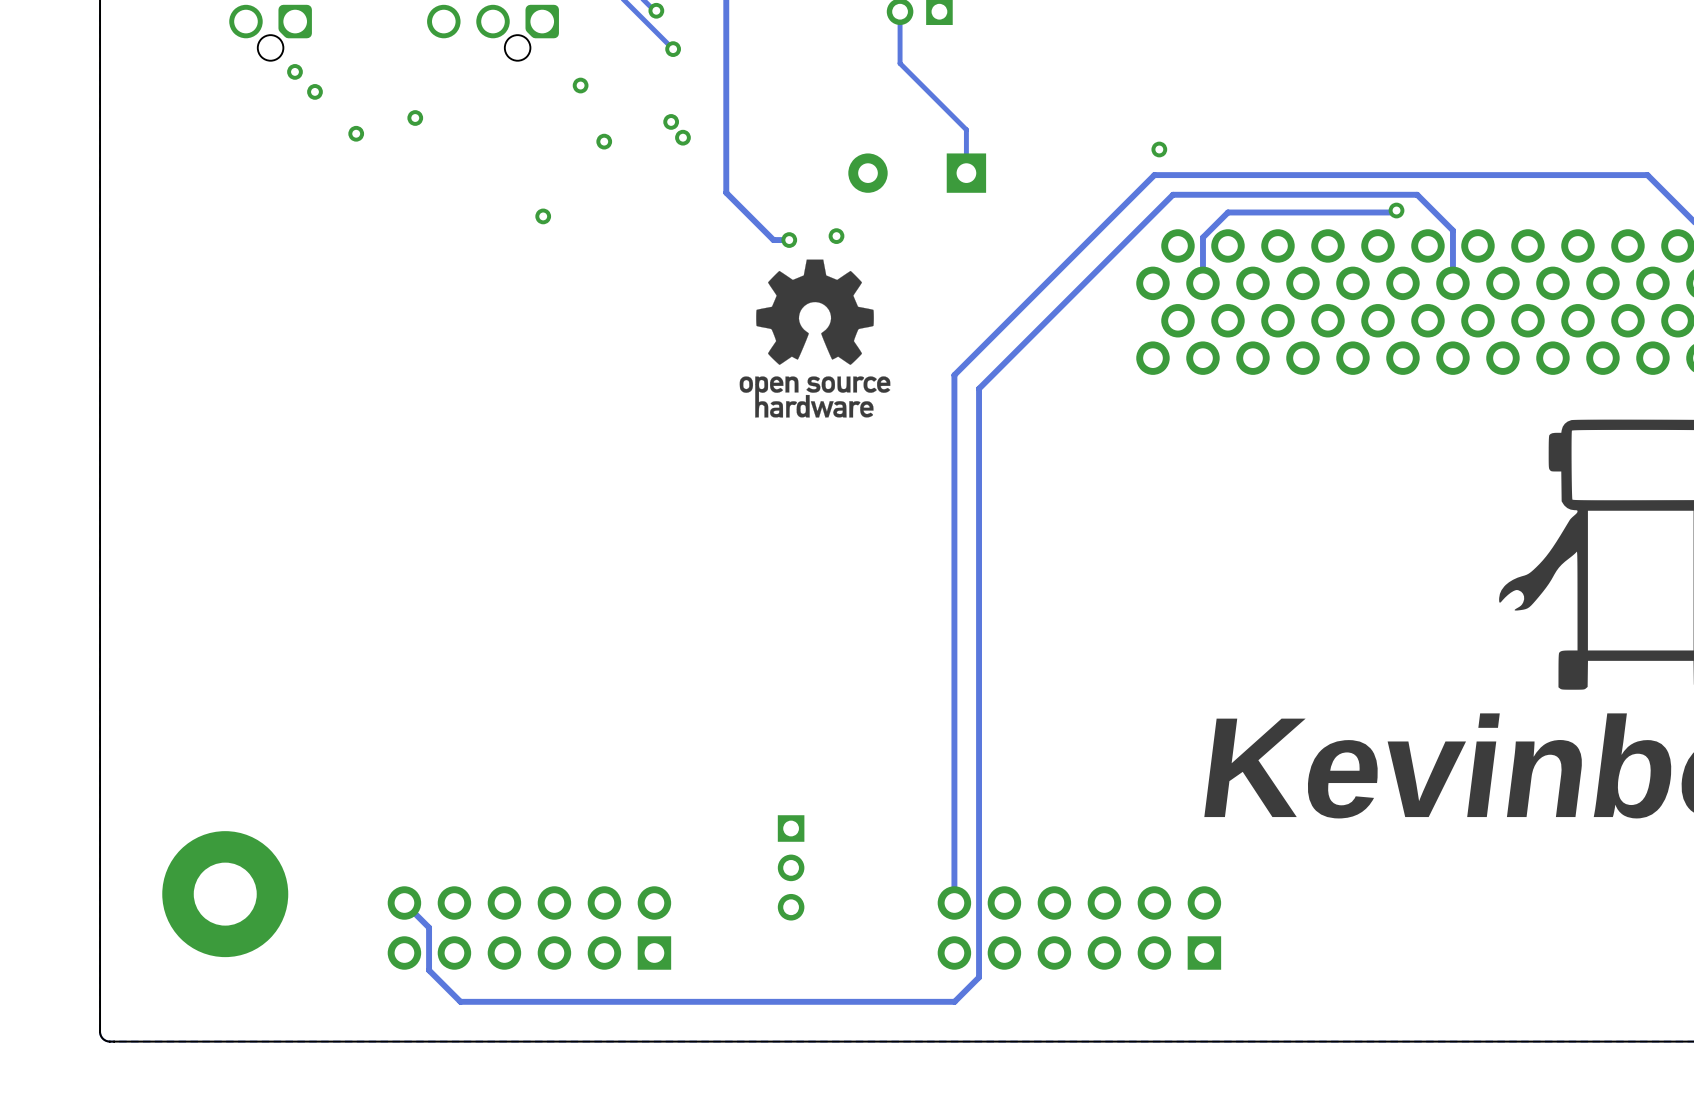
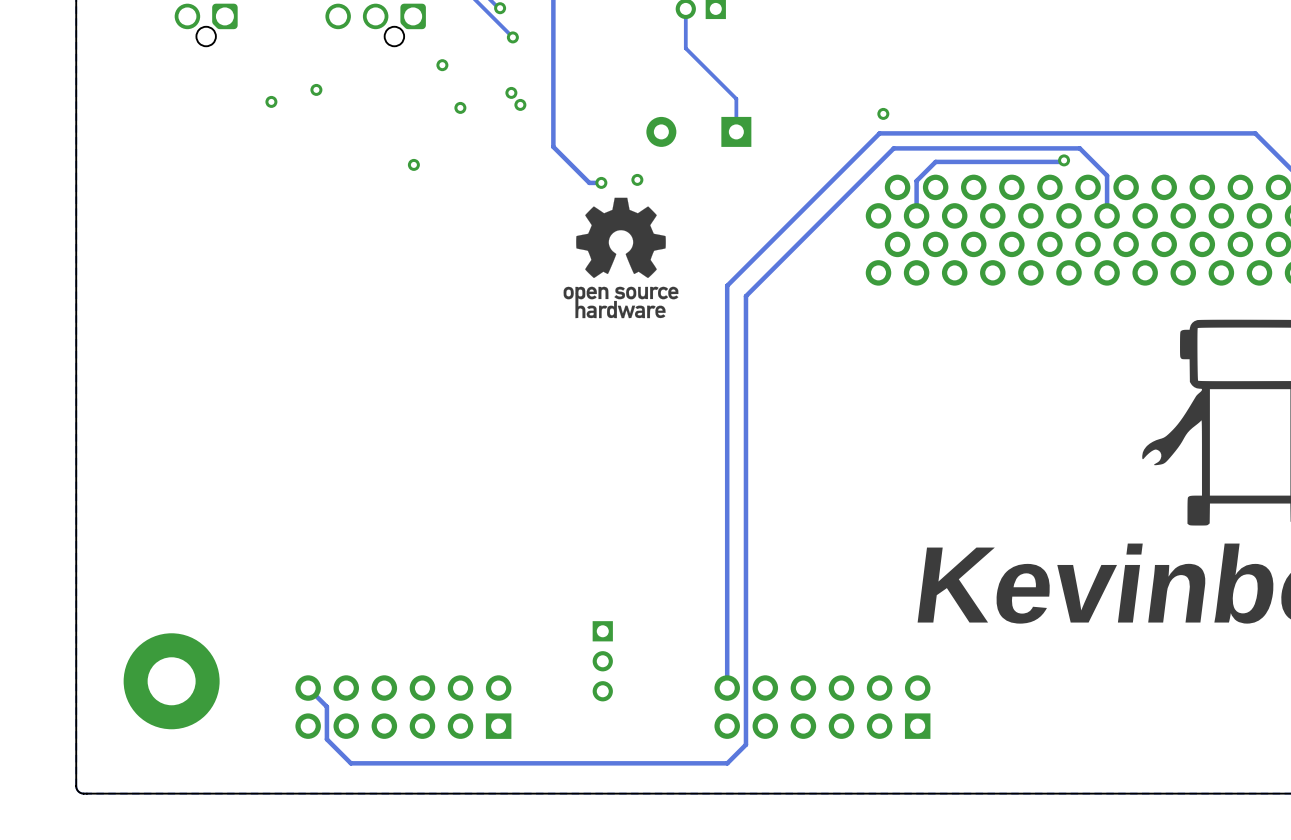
via: (294, 71) -> none
via: (314, 91) -> none

